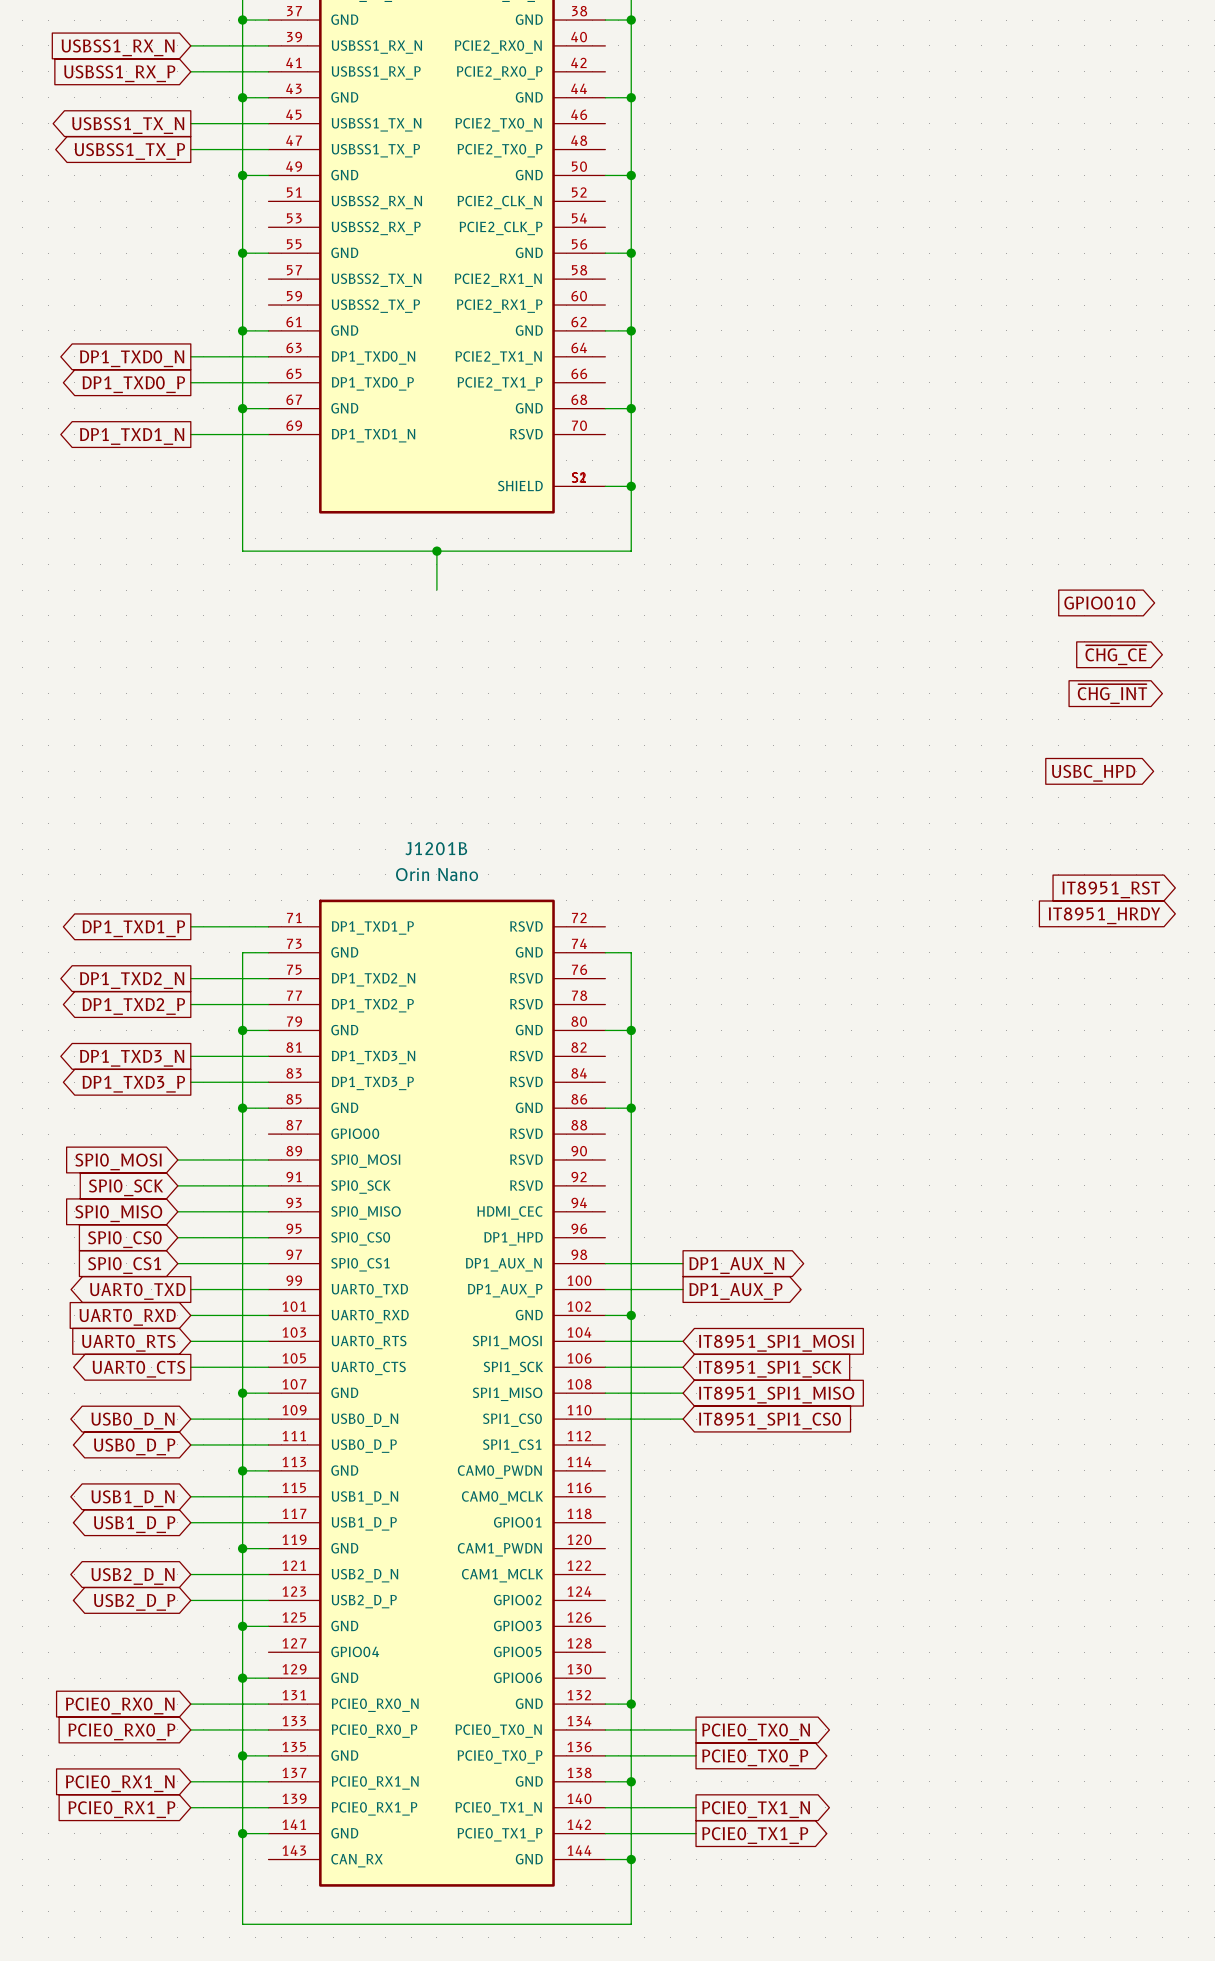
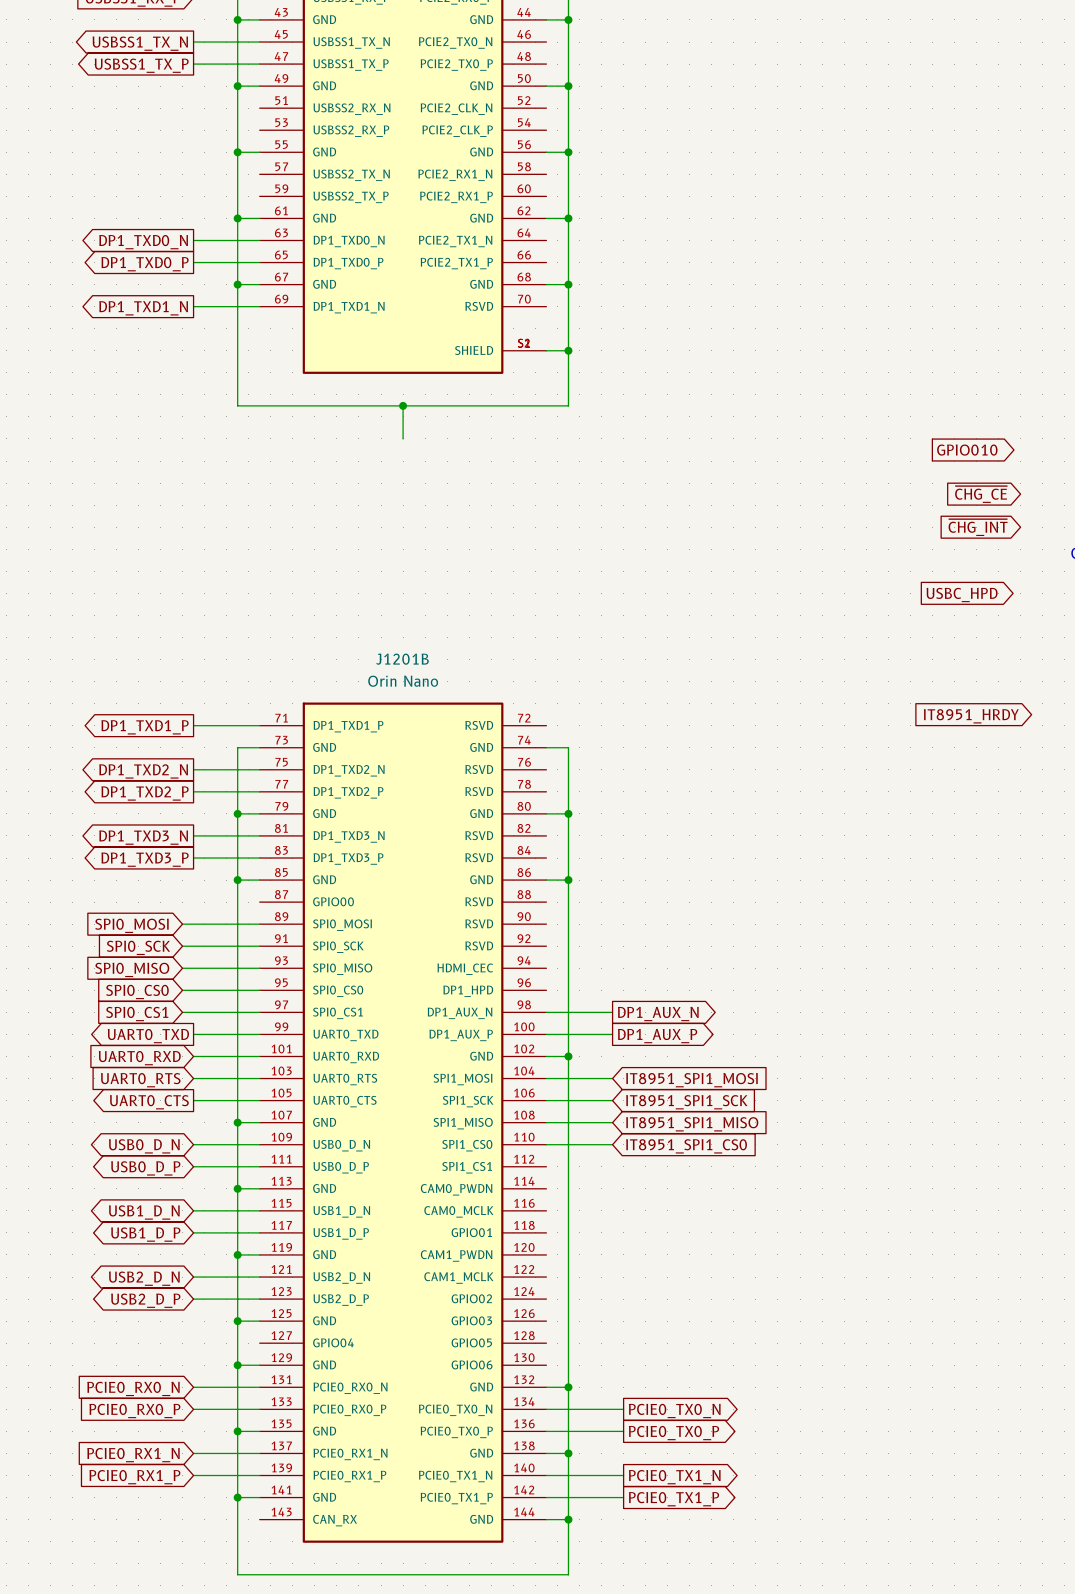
global label: IT8951_RST (1111, 889) -> none

